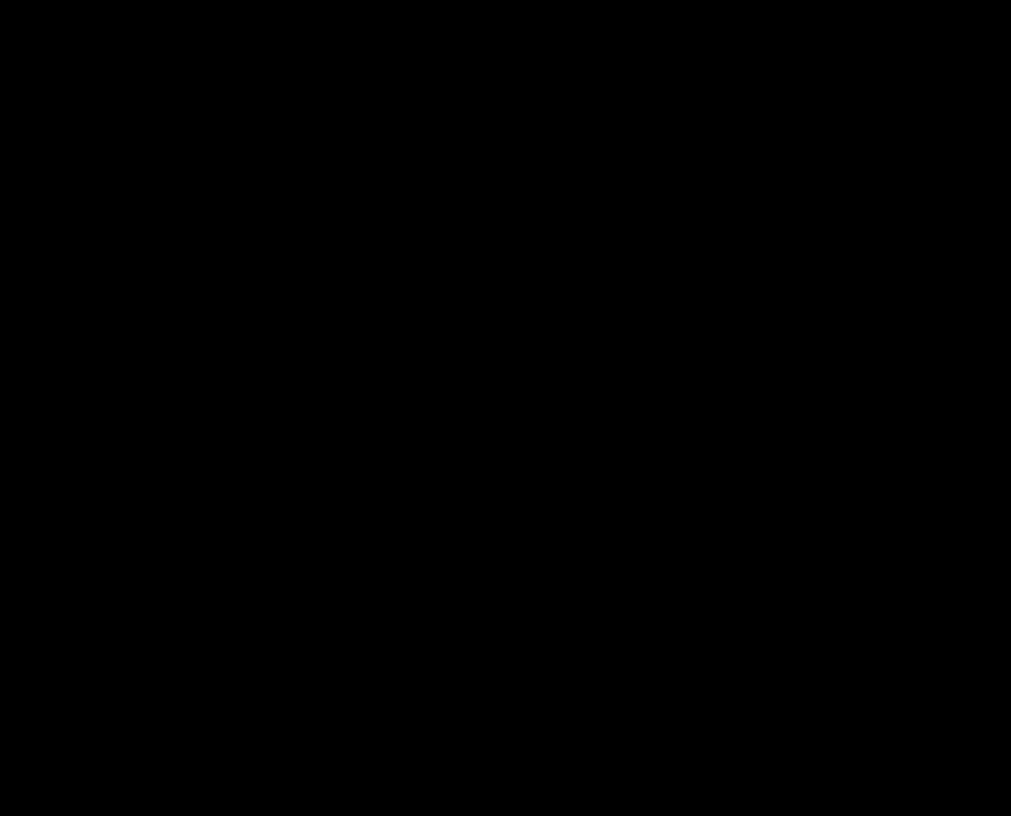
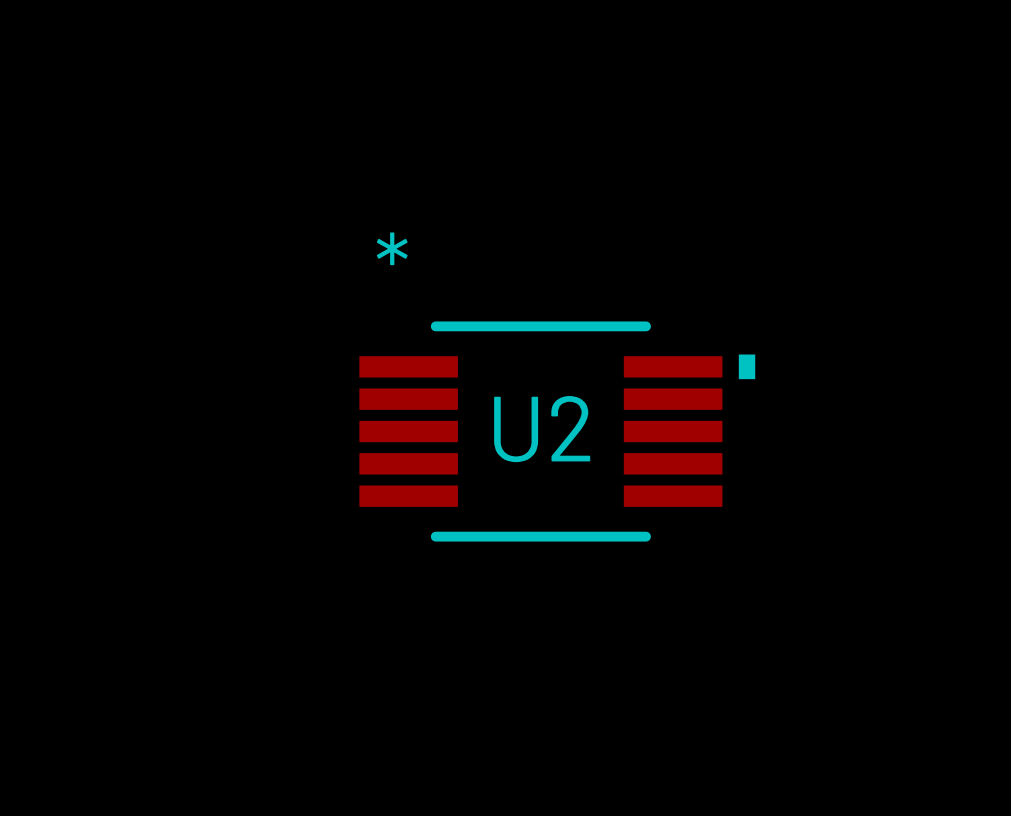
U2: none -> (557, 431)

